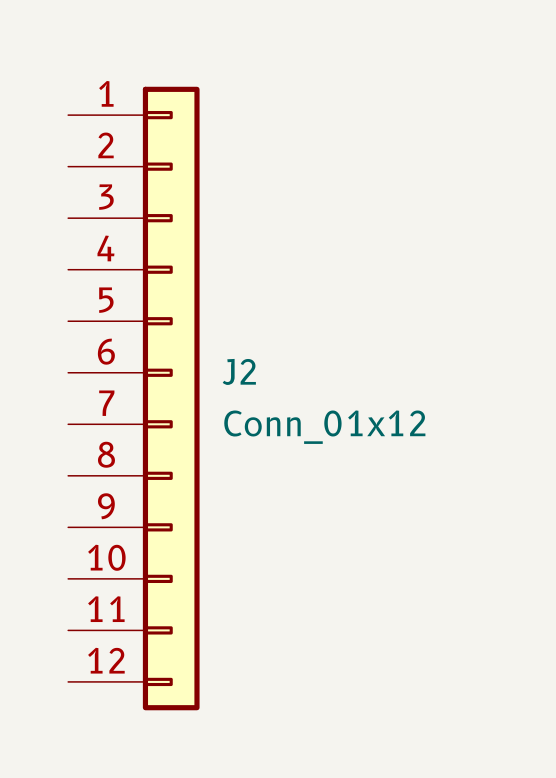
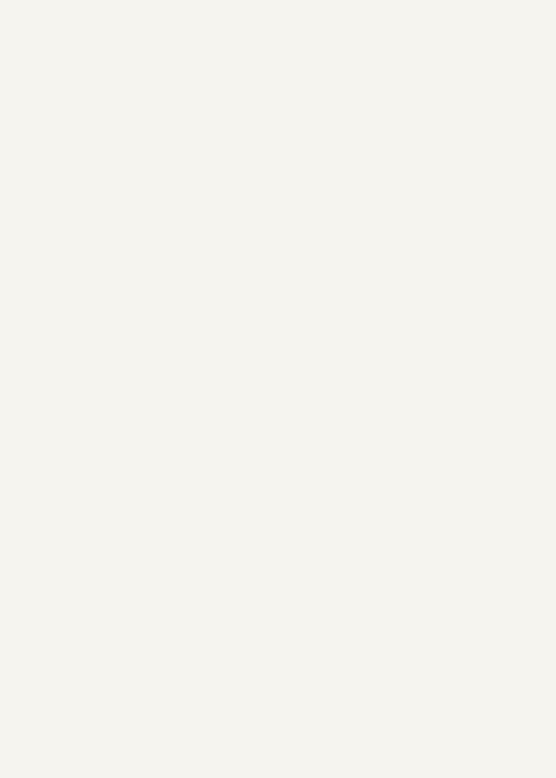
J2: Conn_01x12 (133, 398) -> none

